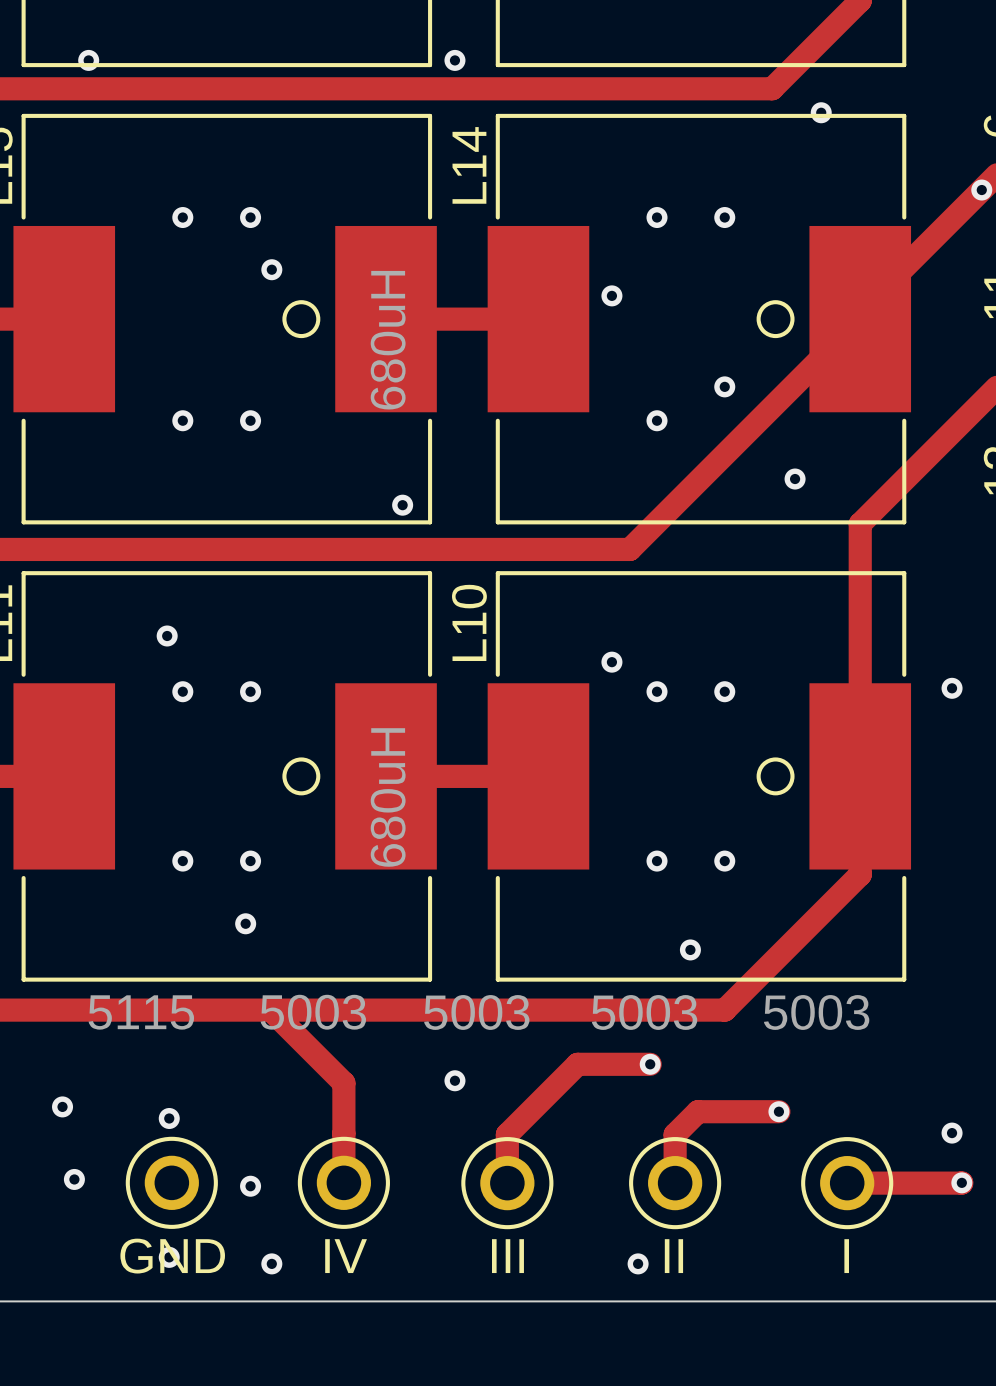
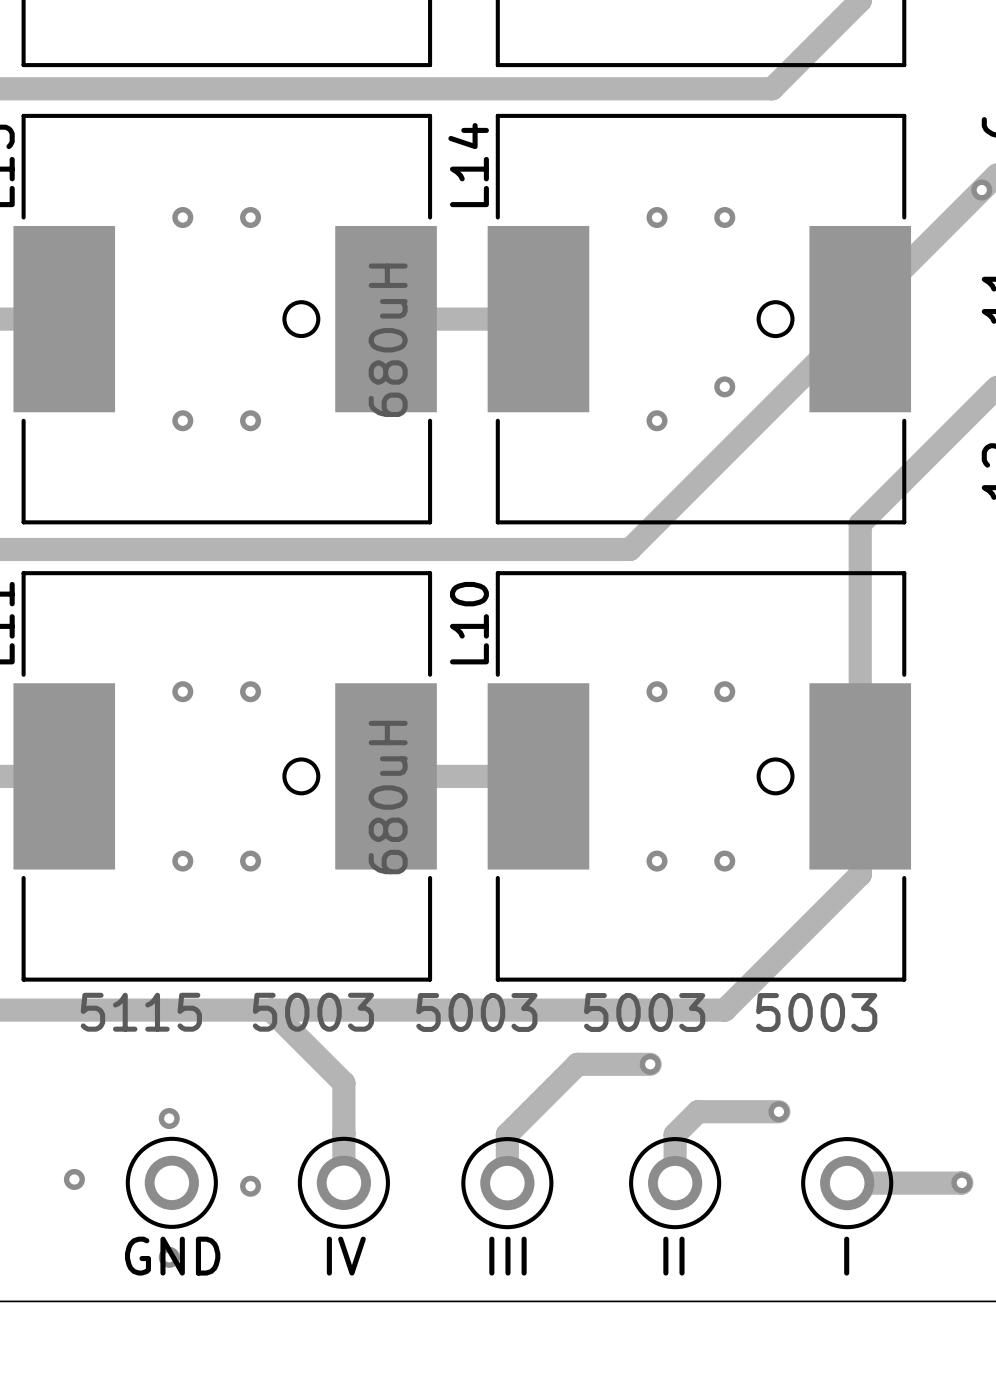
via: (88, 60) -> none
via: (454, 60) -> none
via: (821, 112) -> none
via: (271, 269) -> none
via: (611, 295) -> none
via: (795, 479) -> none
via: (402, 505) -> none
via: (167, 635) -> none
via: (611, 662) -> none
via: (952, 688) -> none
via: (245, 923) -> none
via: (690, 949) -> none
via: (454, 1080) -> none
via: (62, 1106) -> none
via: (952, 1133) -> none
via: (271, 1263) -> none
via: (638, 1263) -> none

